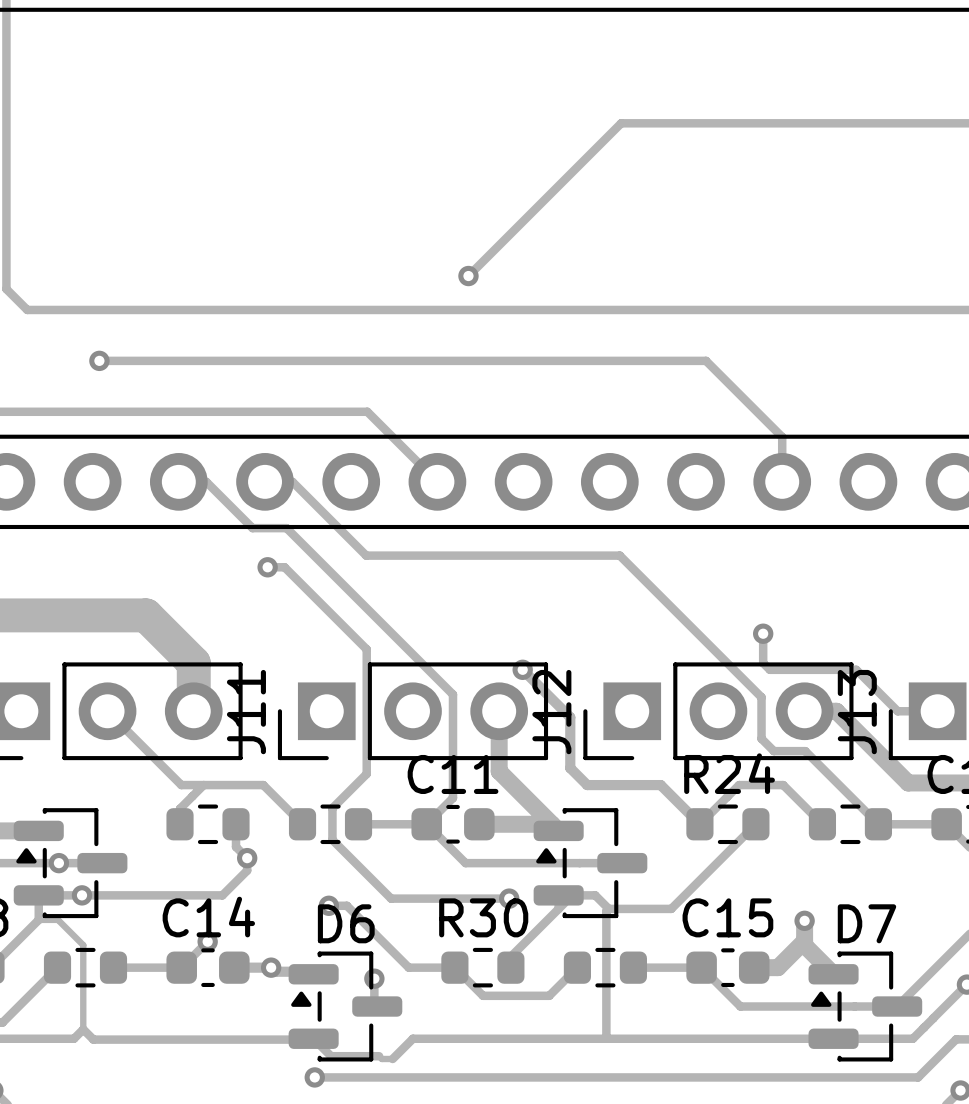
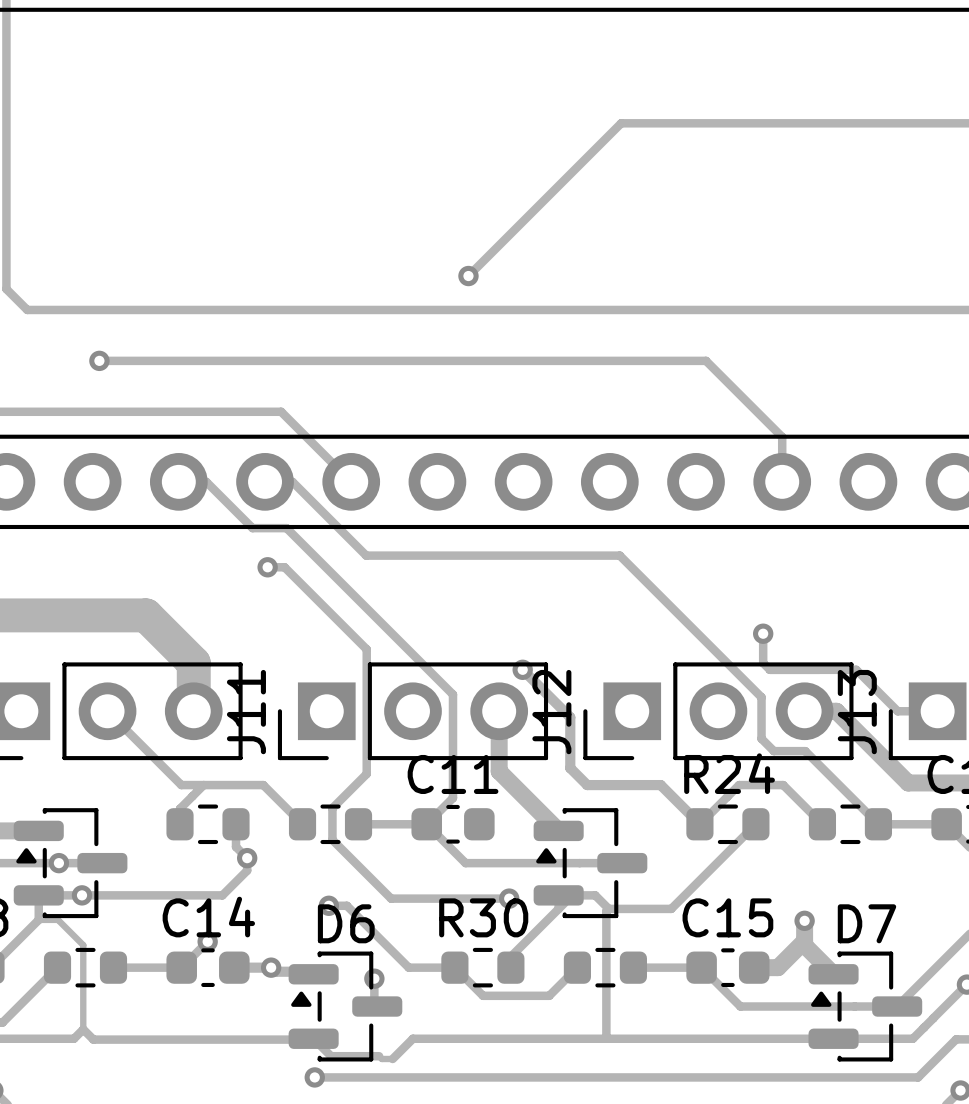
track: (281, 411) (367, 411) (437, 481) -> (281, 411) (351, 481)
track: (479, 824) (552, 824) -> none

